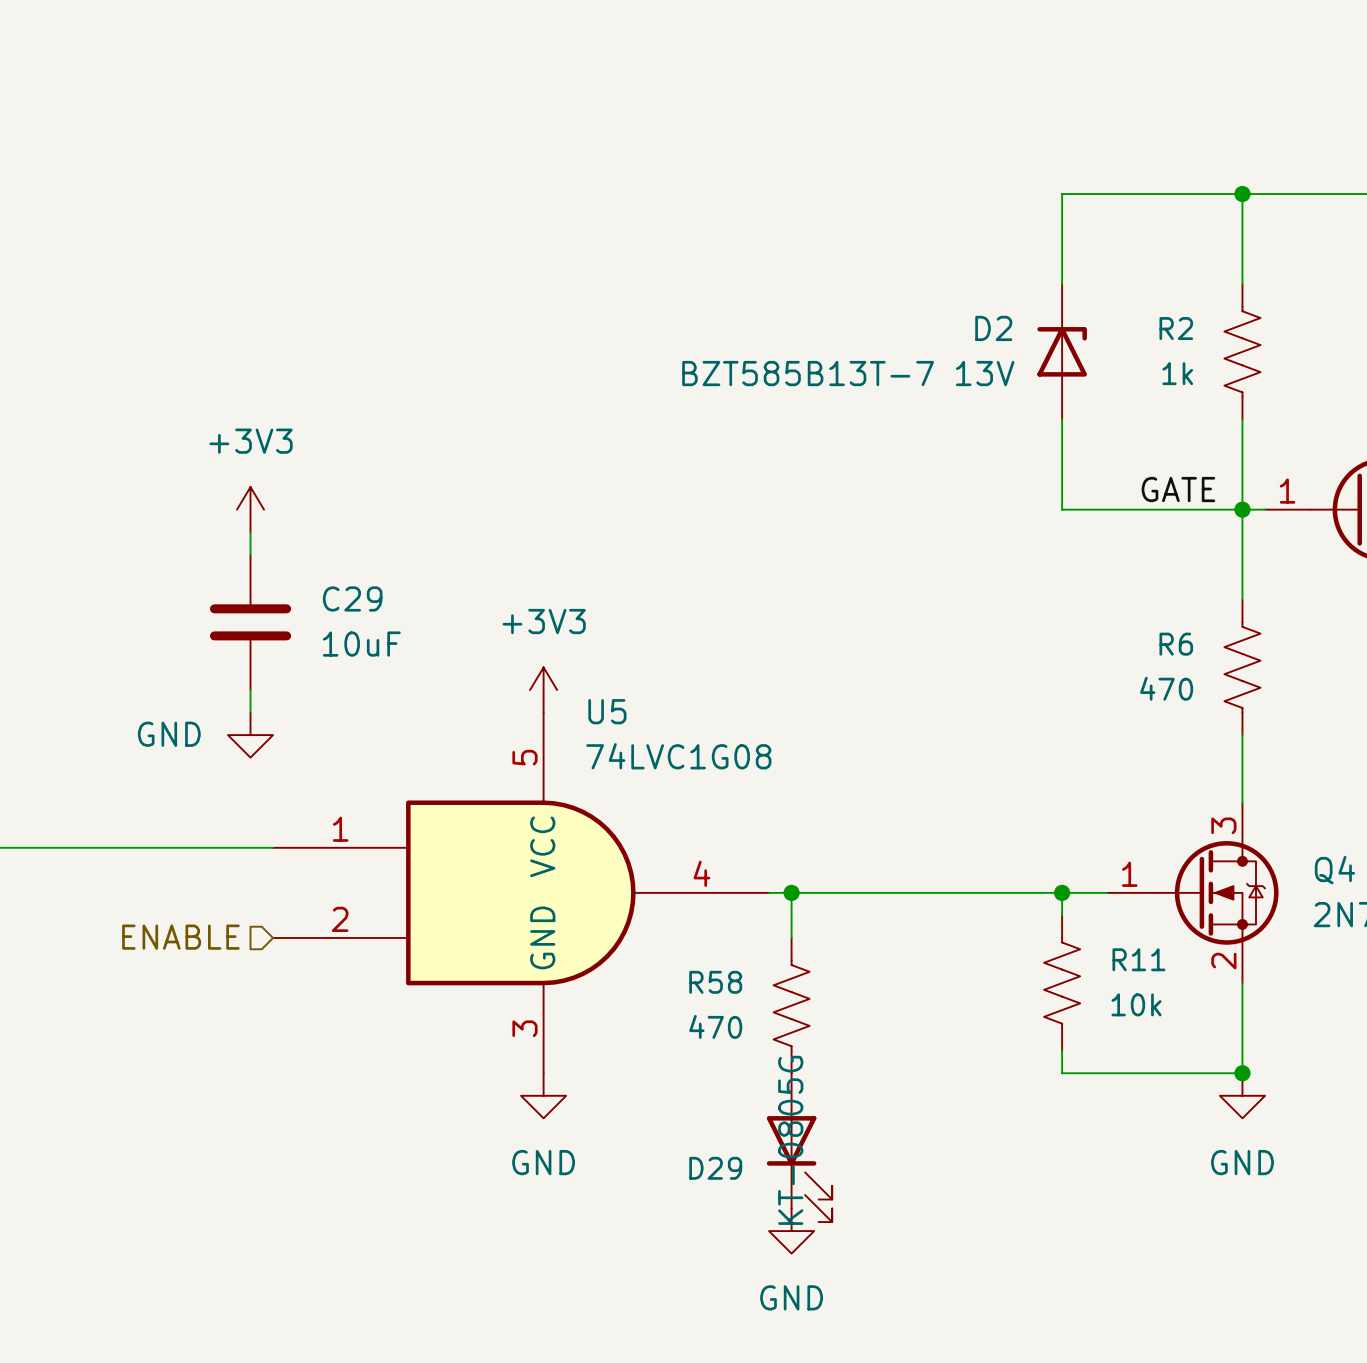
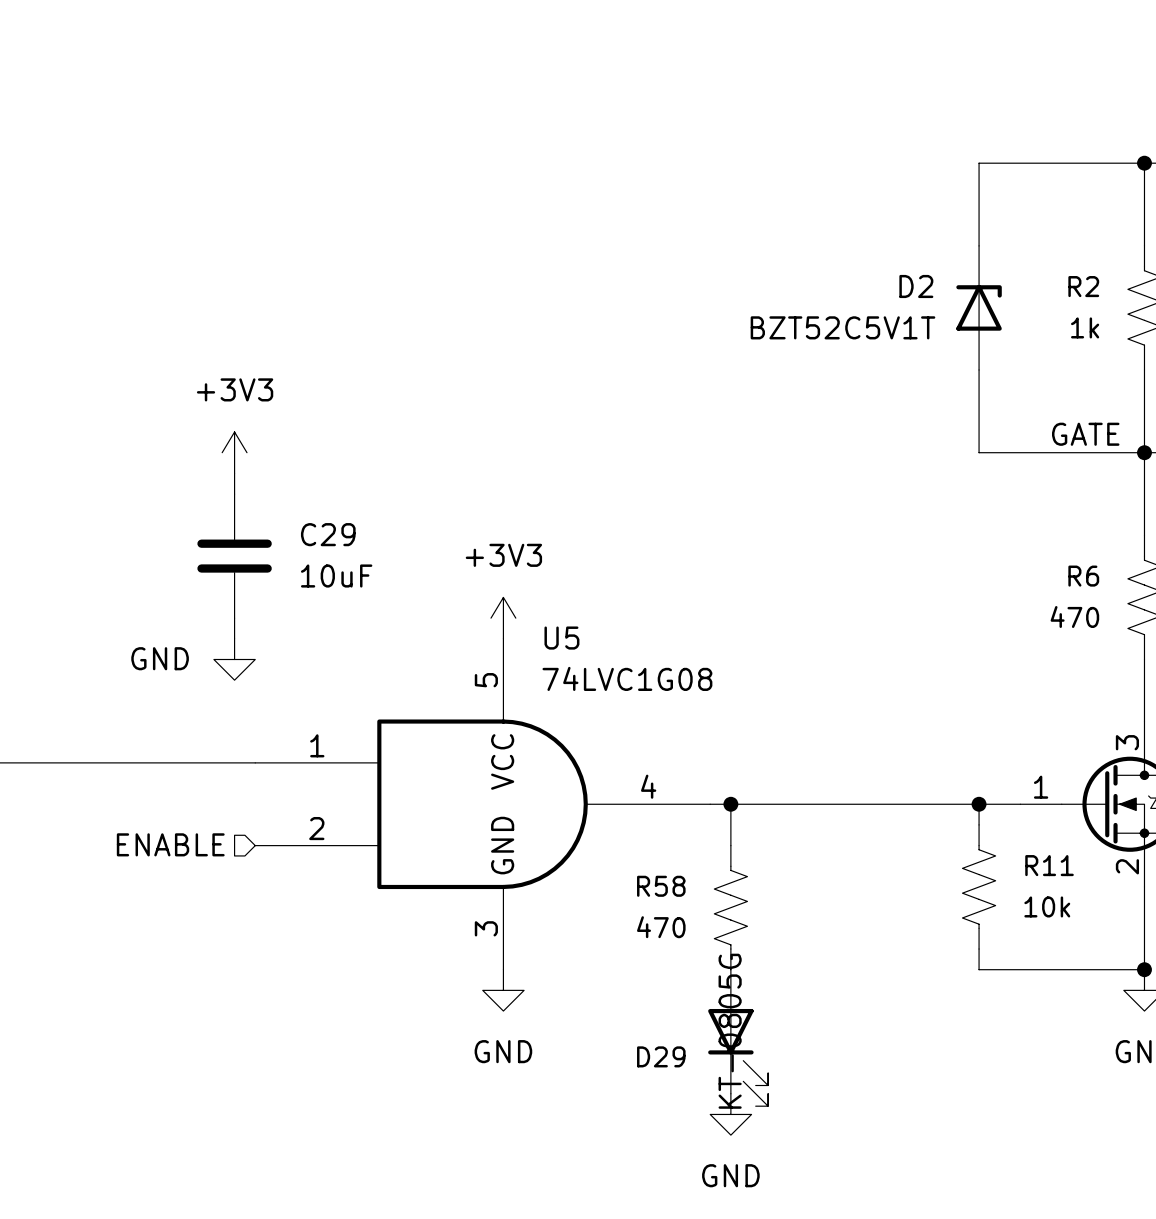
D2 value: BZT585B13T-7 13V (848, 373) -> BZT52C5V1T (843, 327)

